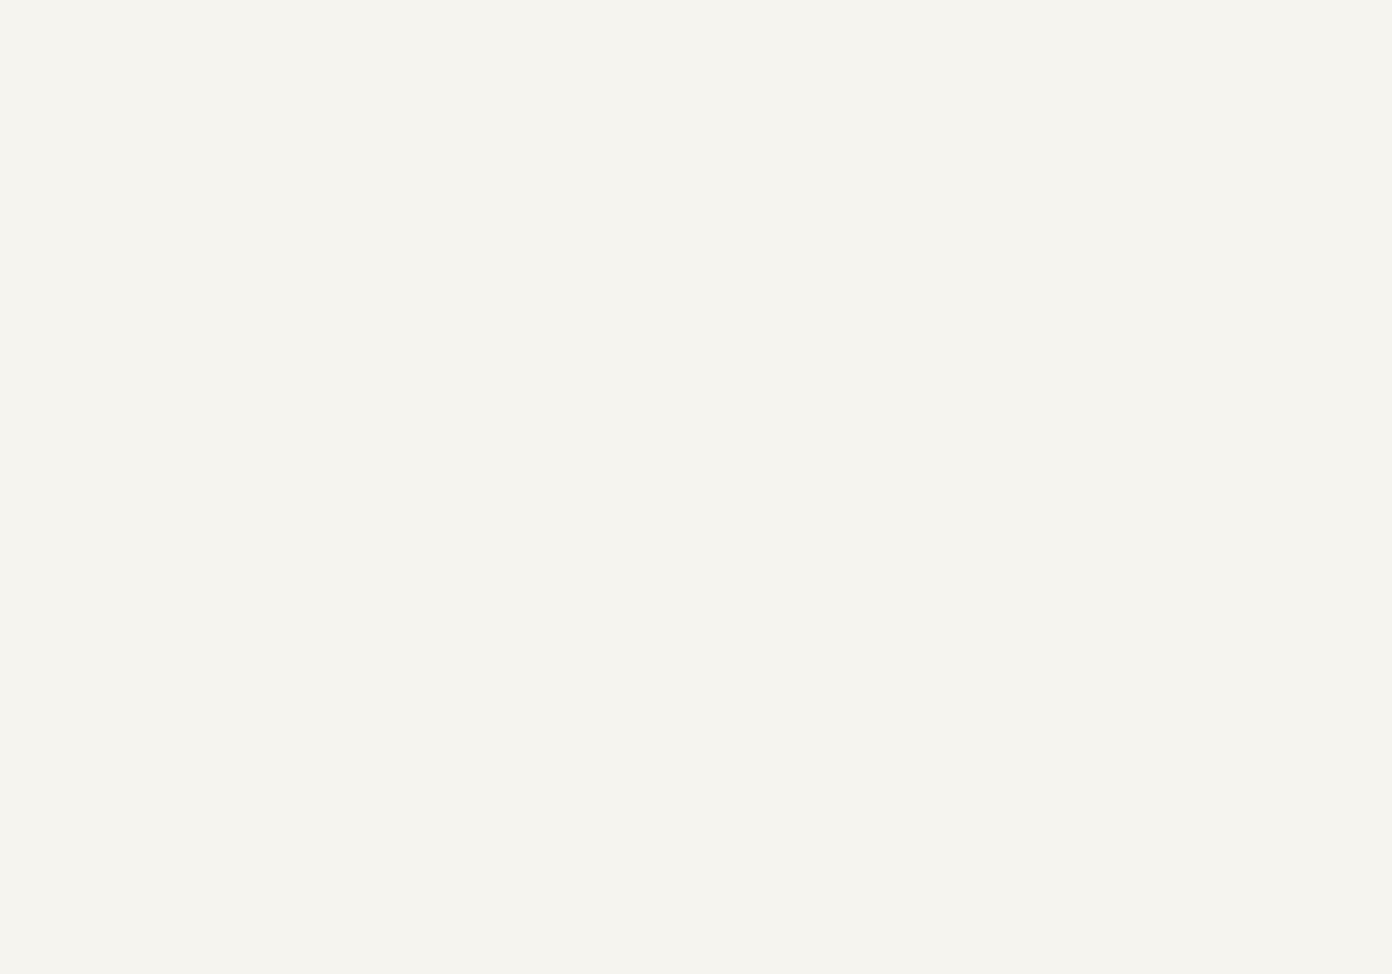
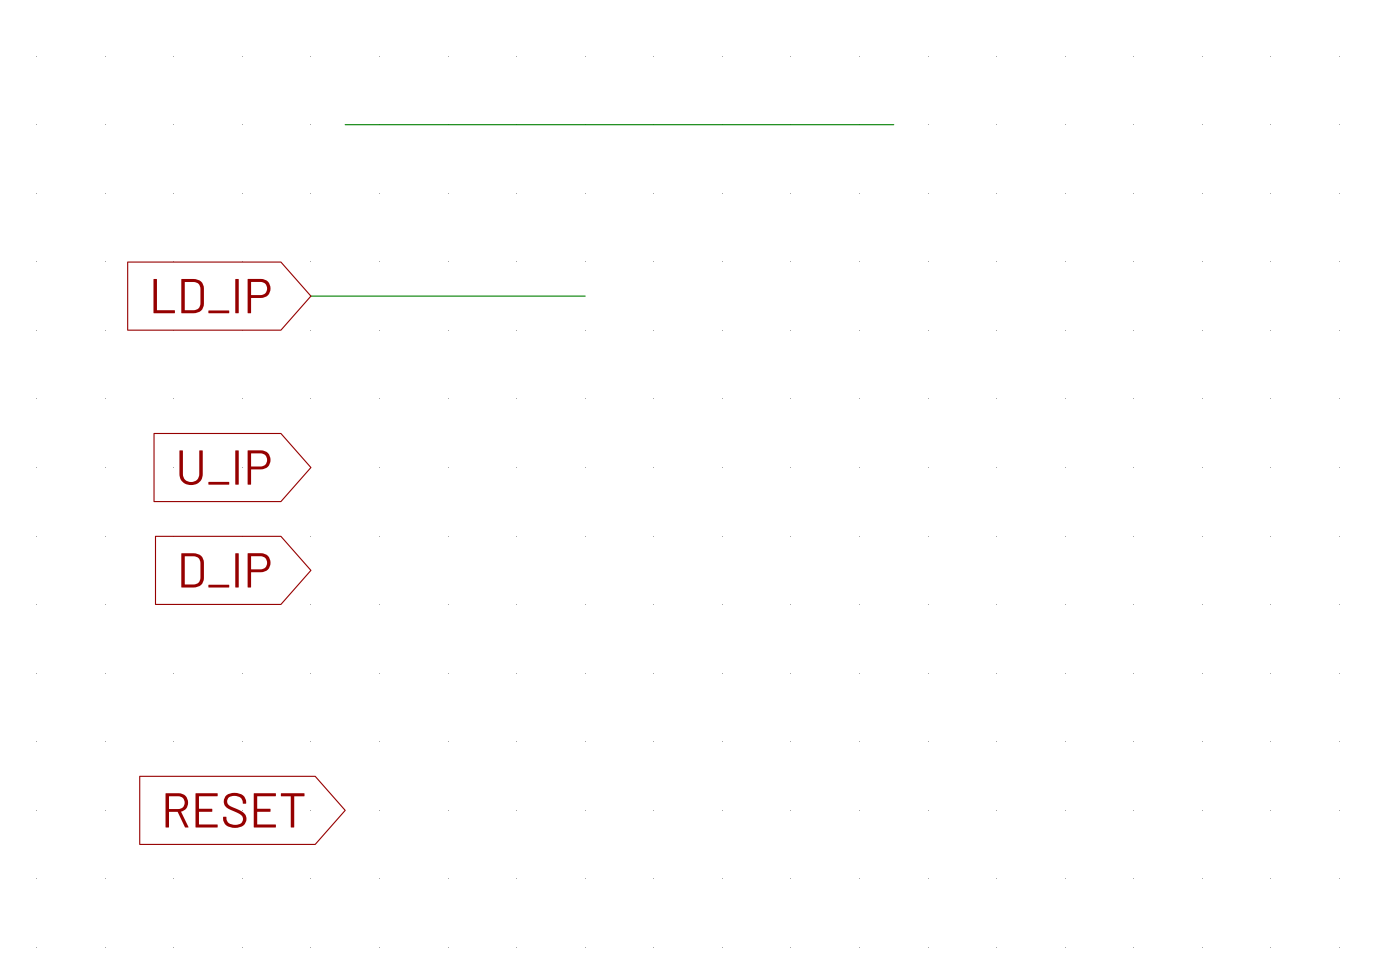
wire: none -> (345, 124) (893, 124)
wire: none -> (310, 296) (585, 296)
global label: none -> LD_IP (212, 296)
global label: none -> U_IP (224, 467)
global label: none -> D_IP (225, 570)
global label: none -> RESET (235, 810)

